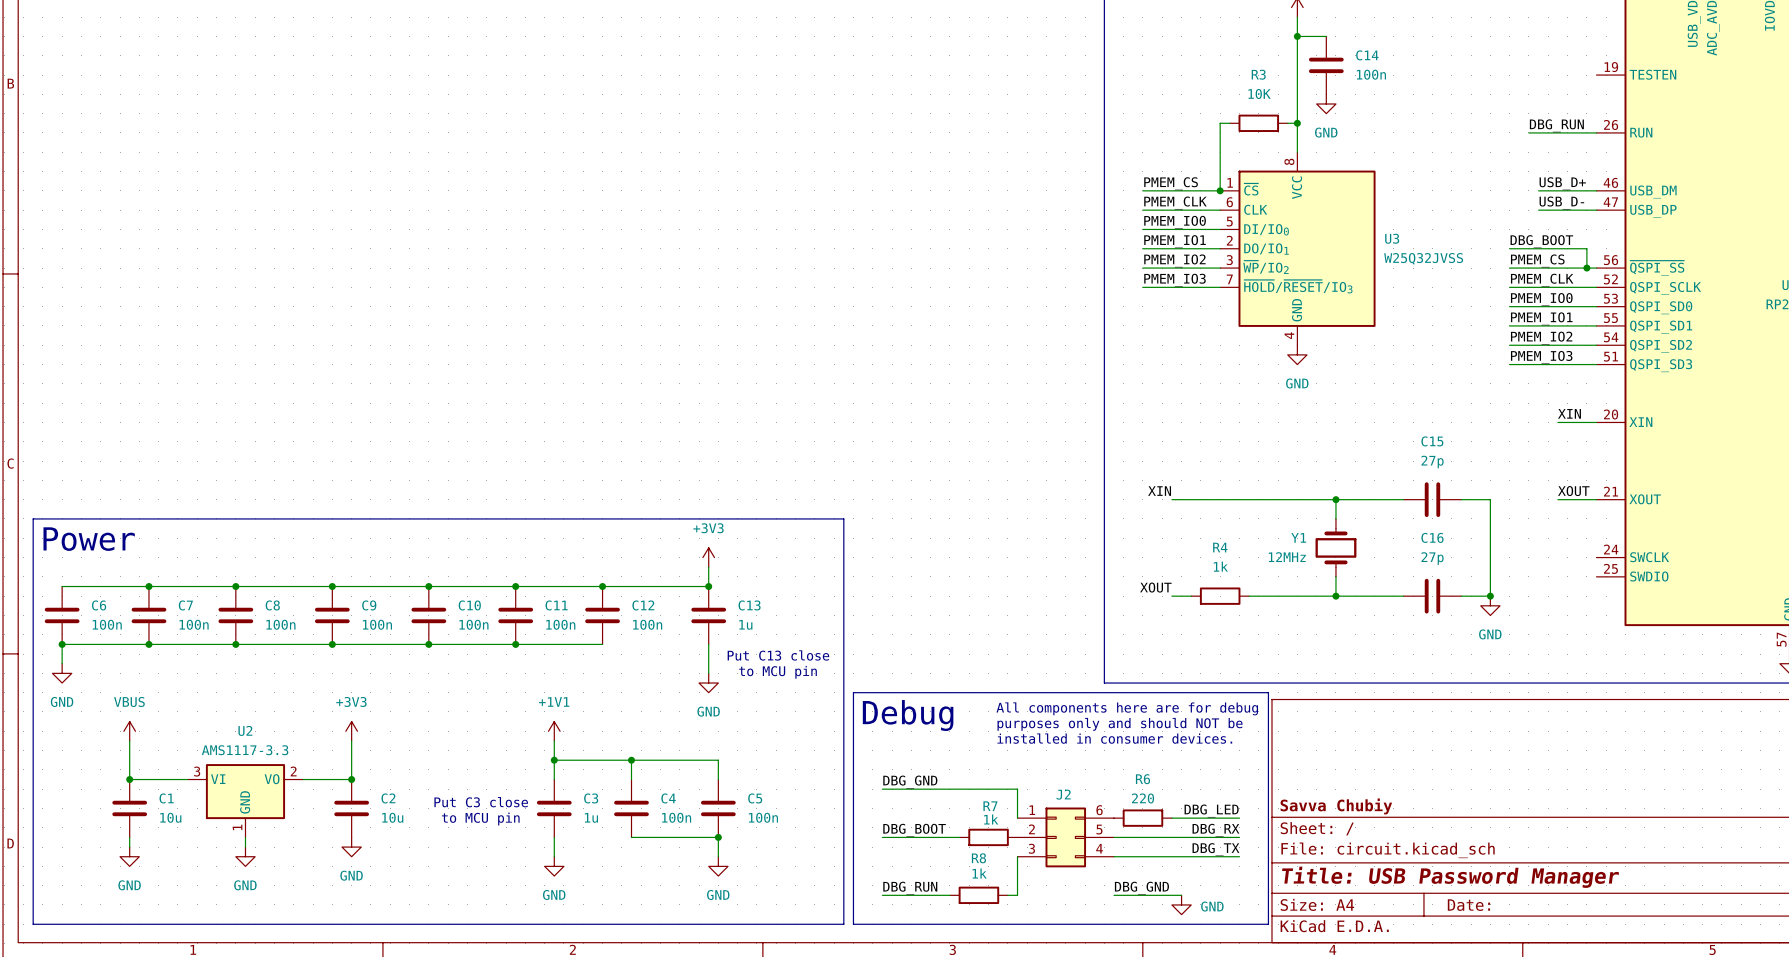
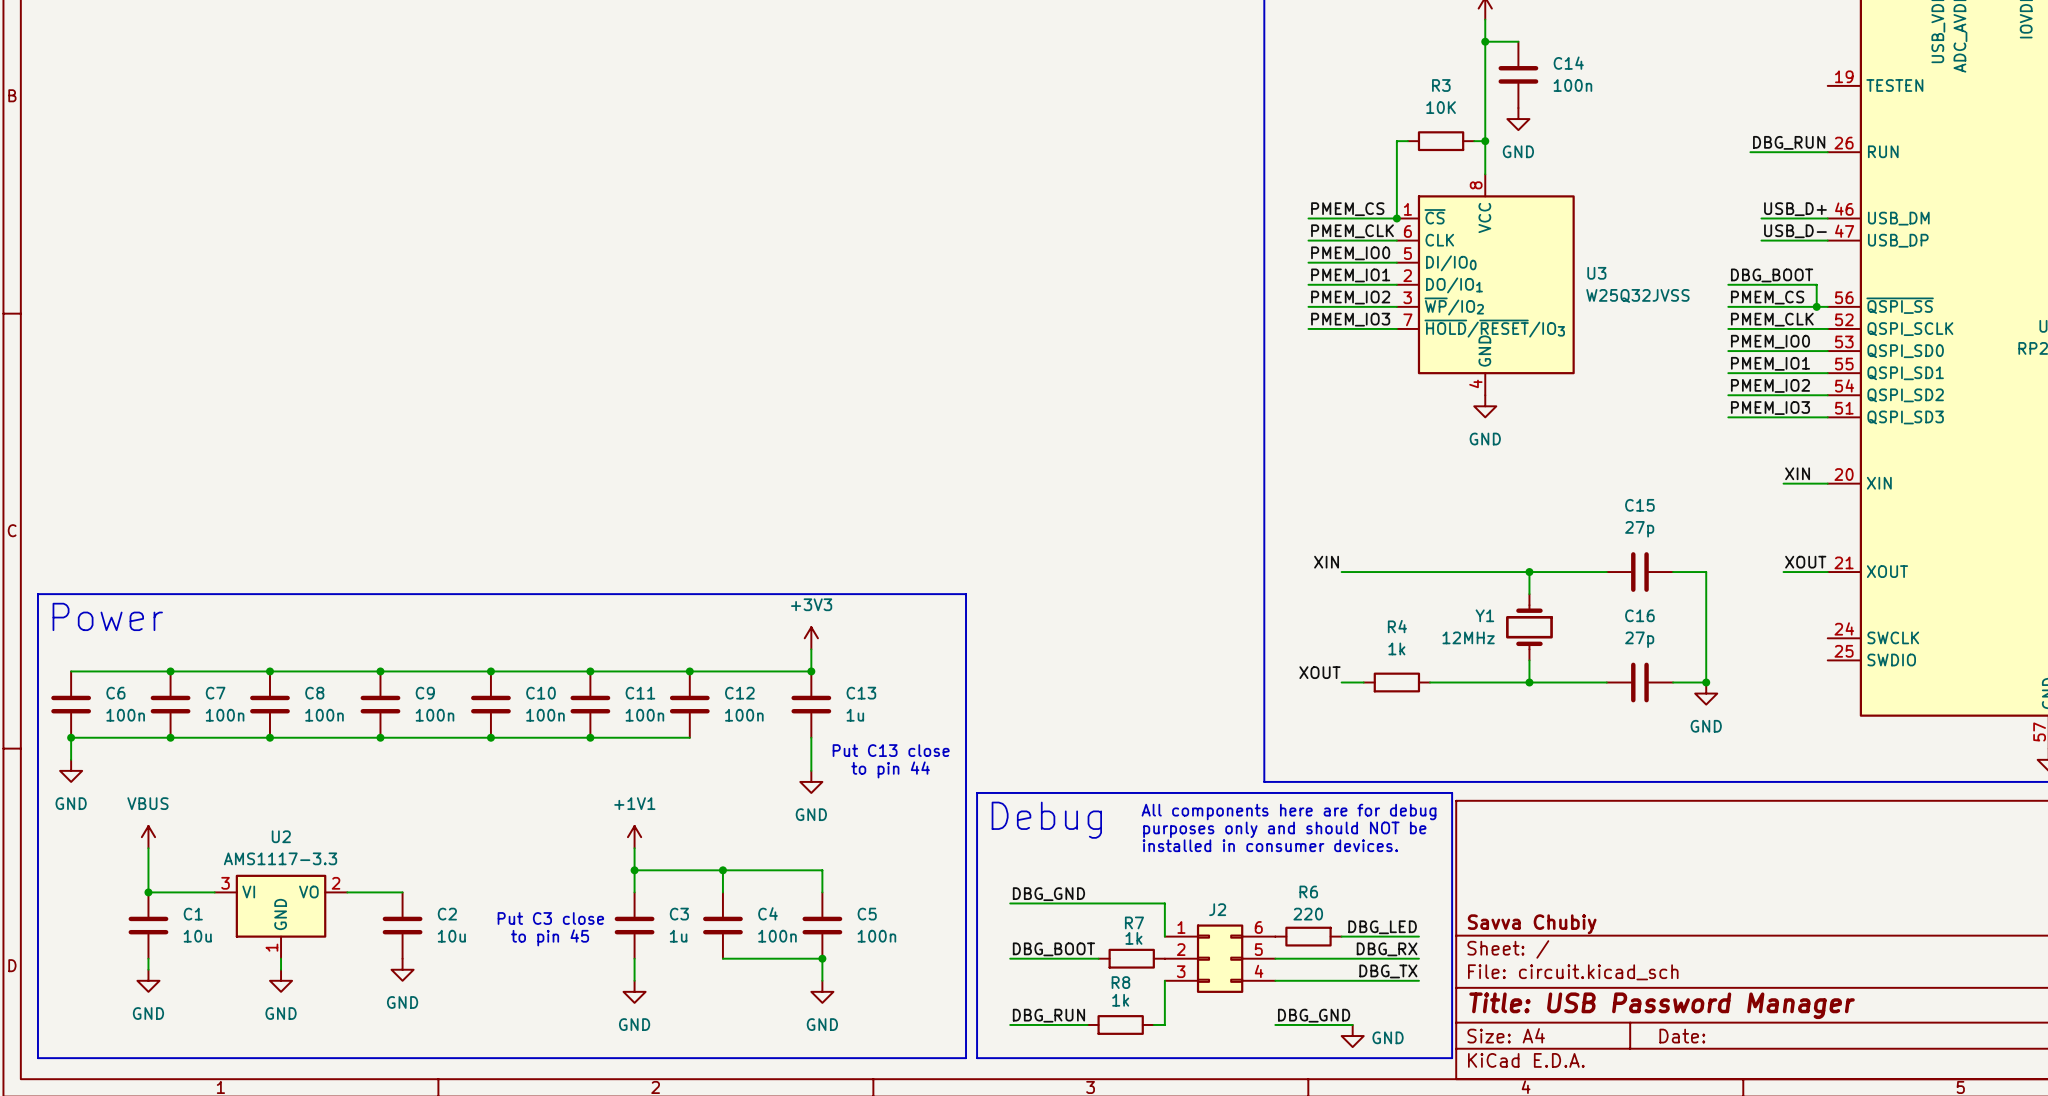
text: to MCU pin (778, 672) -> to pin 44 (890, 769)
power symbol: +3V3 (351, 731) -> none
wire: (351, 740) (351, 779) -> none
junction: (351, 779) -> none
text: to MCU pin (480, 819) -> to pin 45 (550, 937)

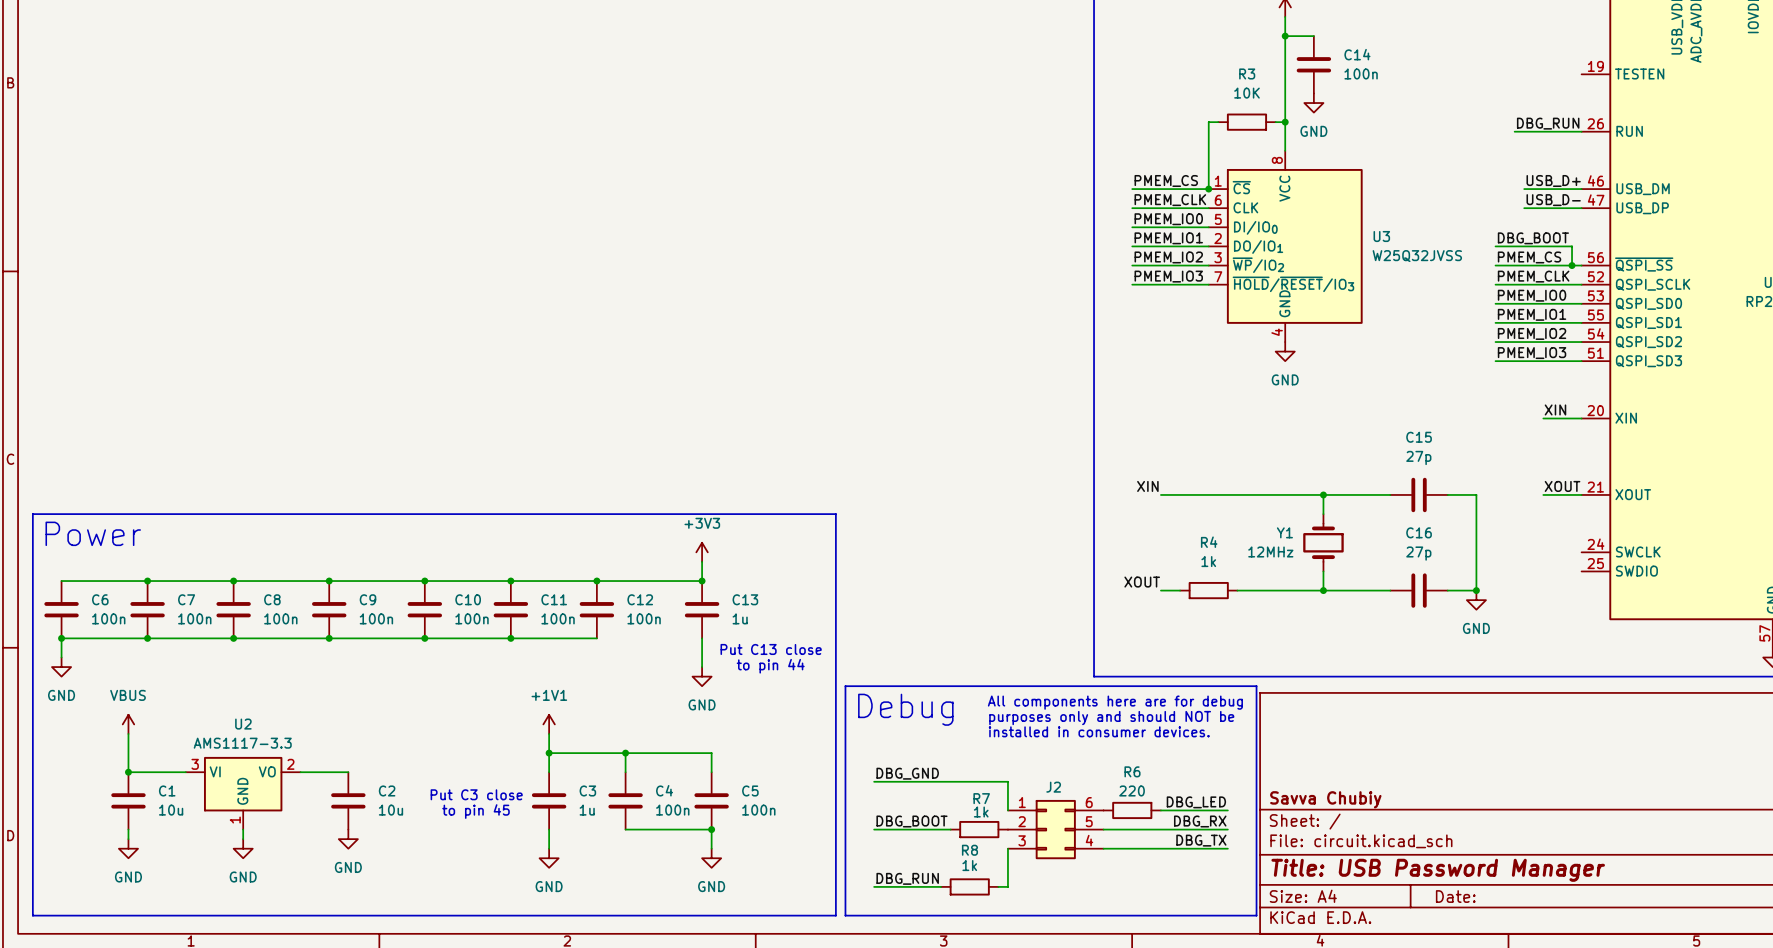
label: DBG_GND (1314, 1015) -> none
wire: (1275, 1024) (1352, 1024) -> none
power symbol: GND (1352, 1036) -> none

